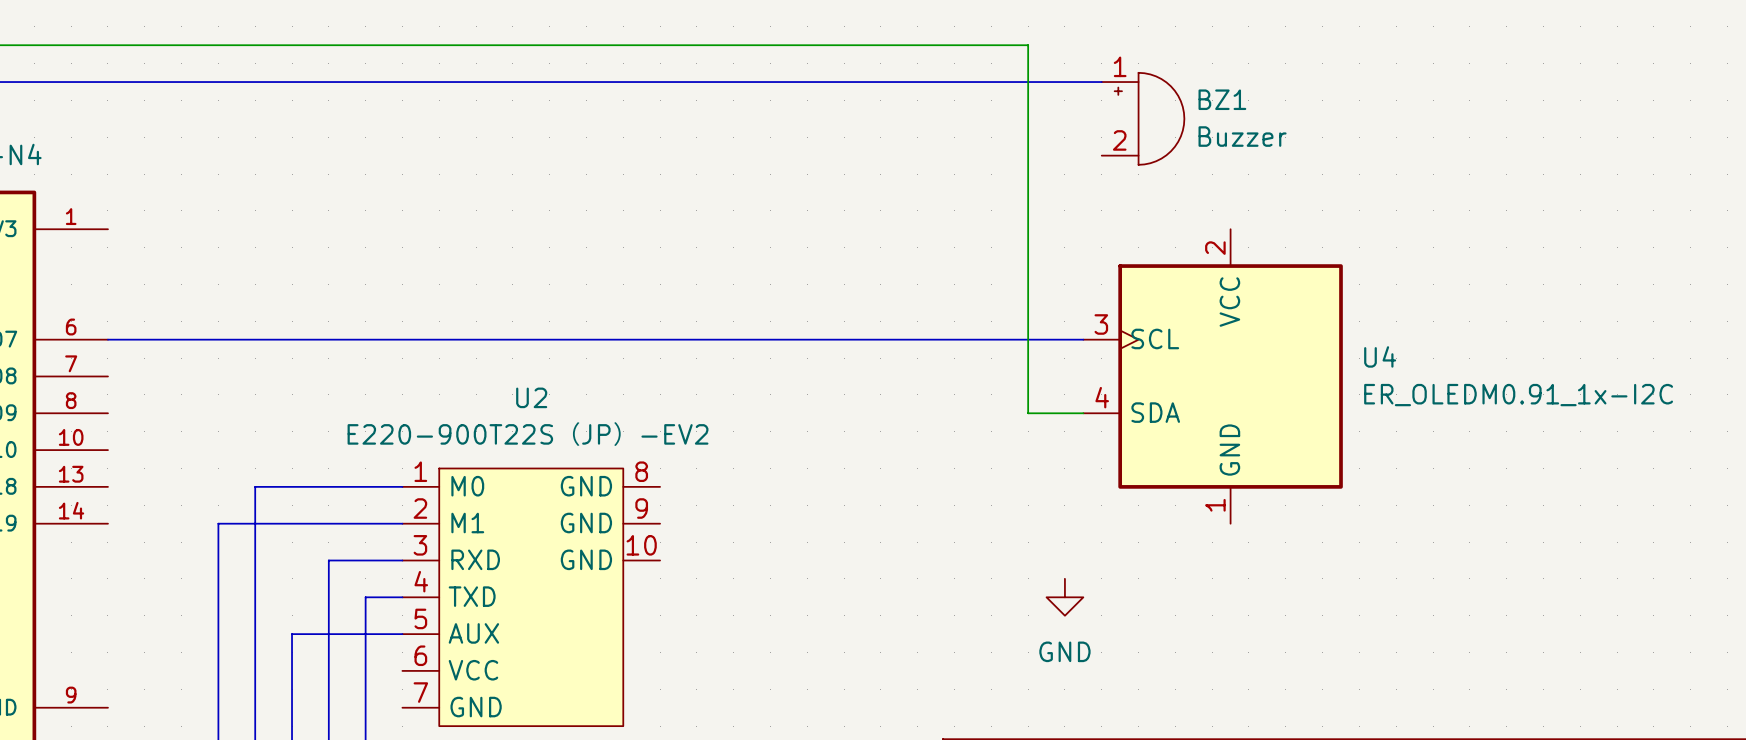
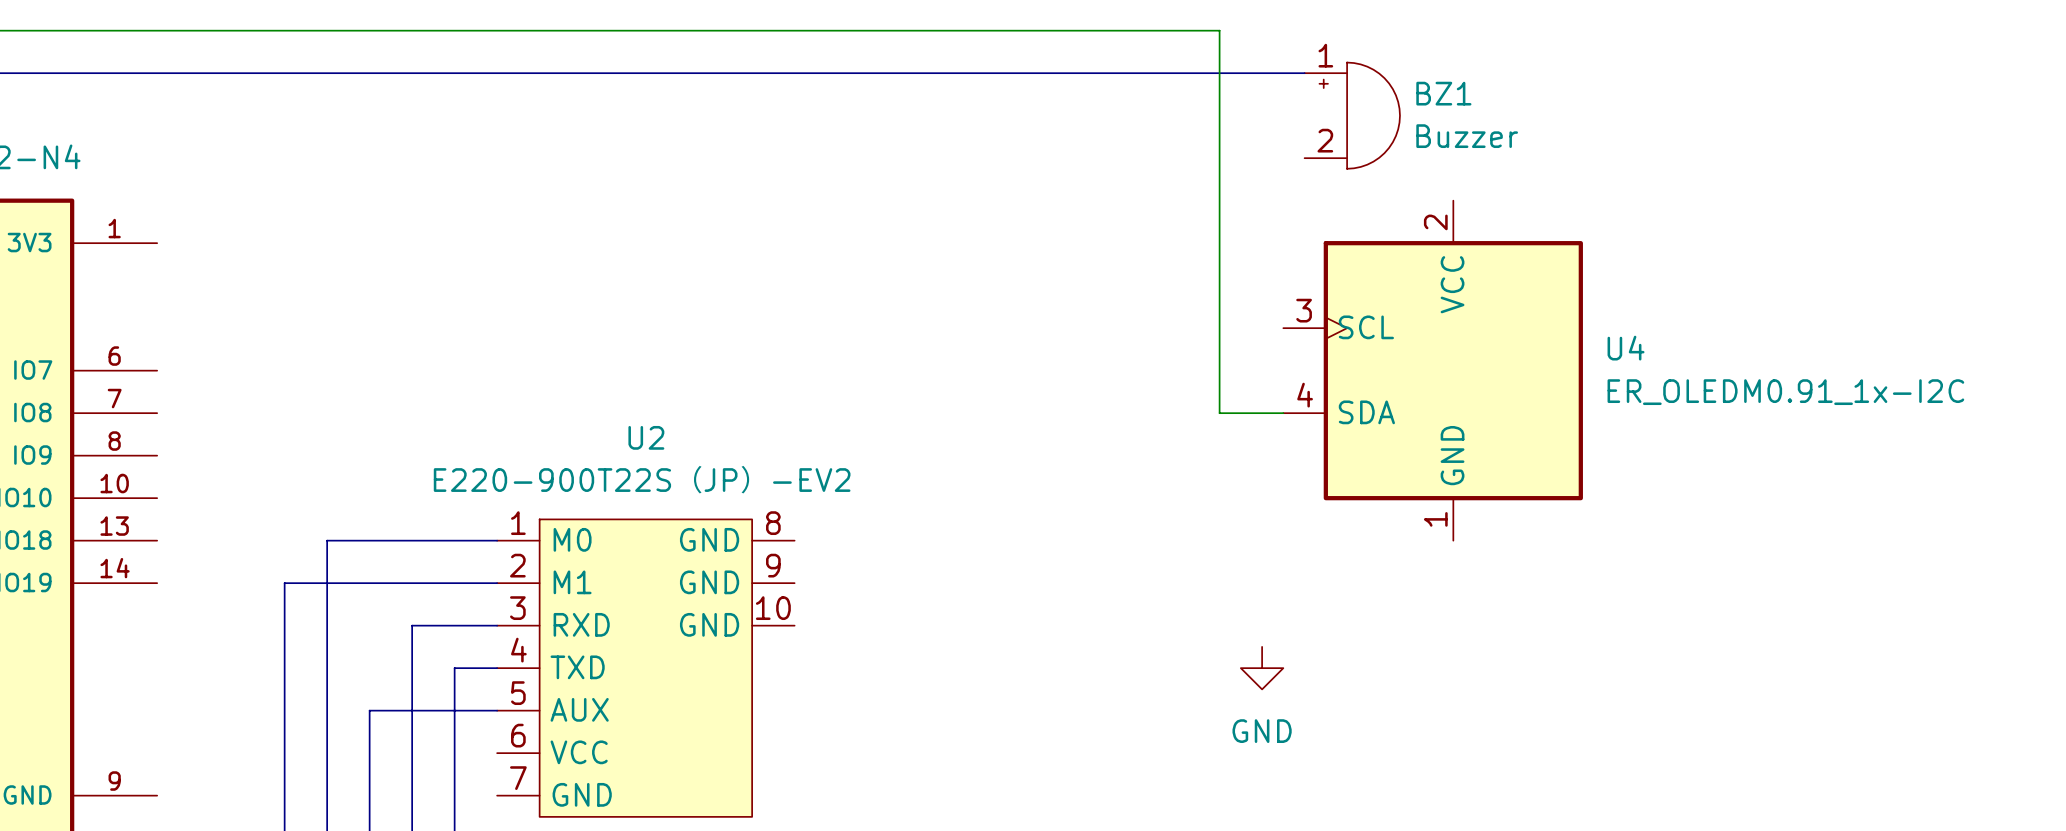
bus: (107, 339) (1083, 339) -> none
wire: (1028, 376) (1028, 413) (1083, 413) -> (1219, 413) (1283, 413)
U4 position: (1213, 376) -> (1433, 370)

